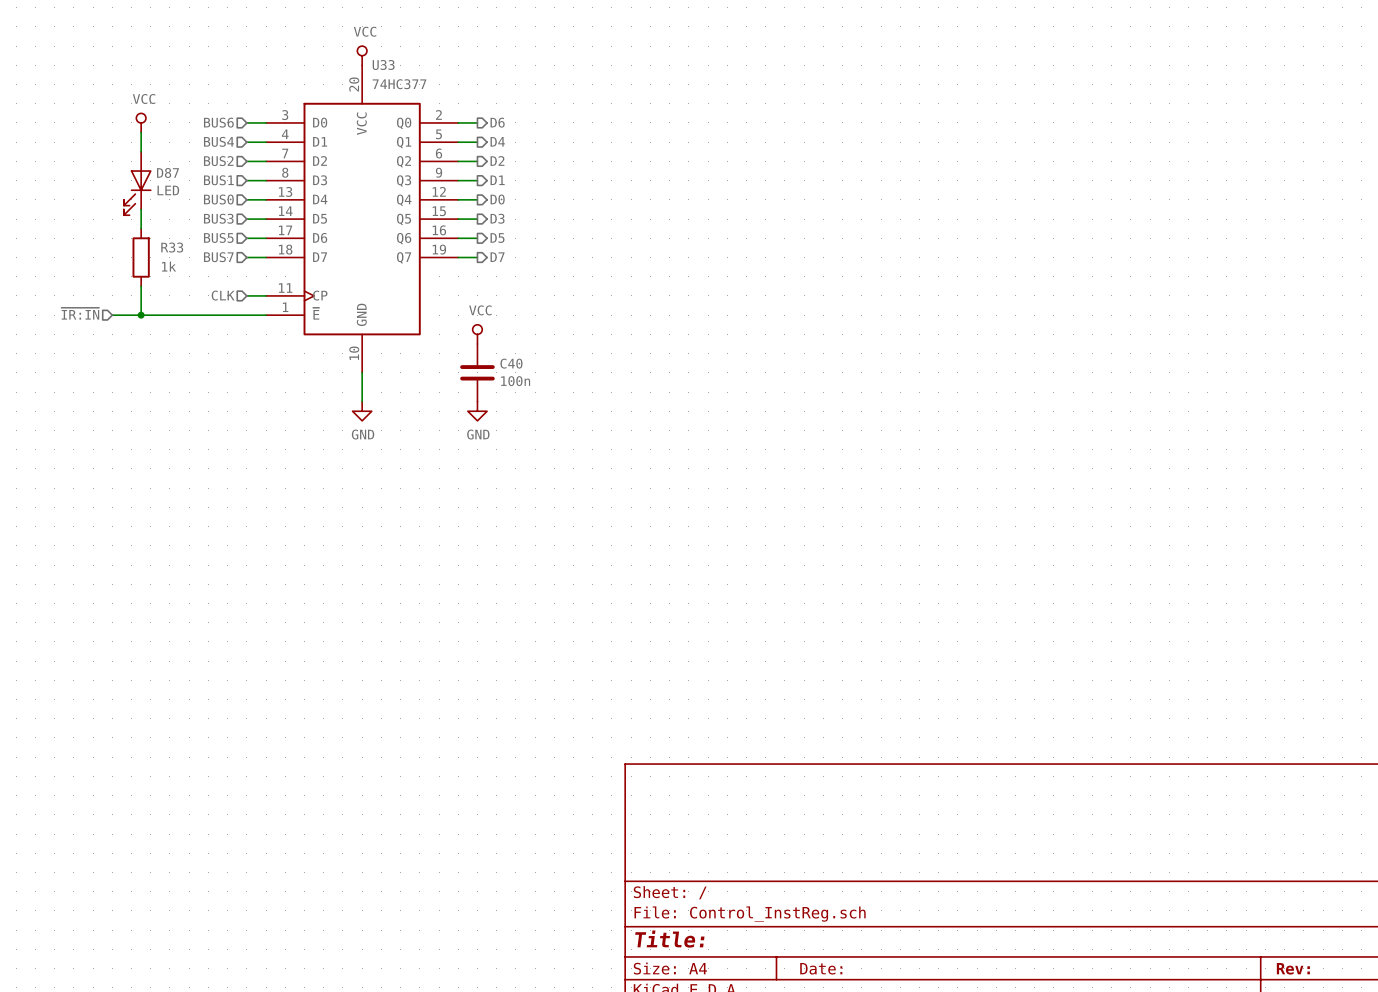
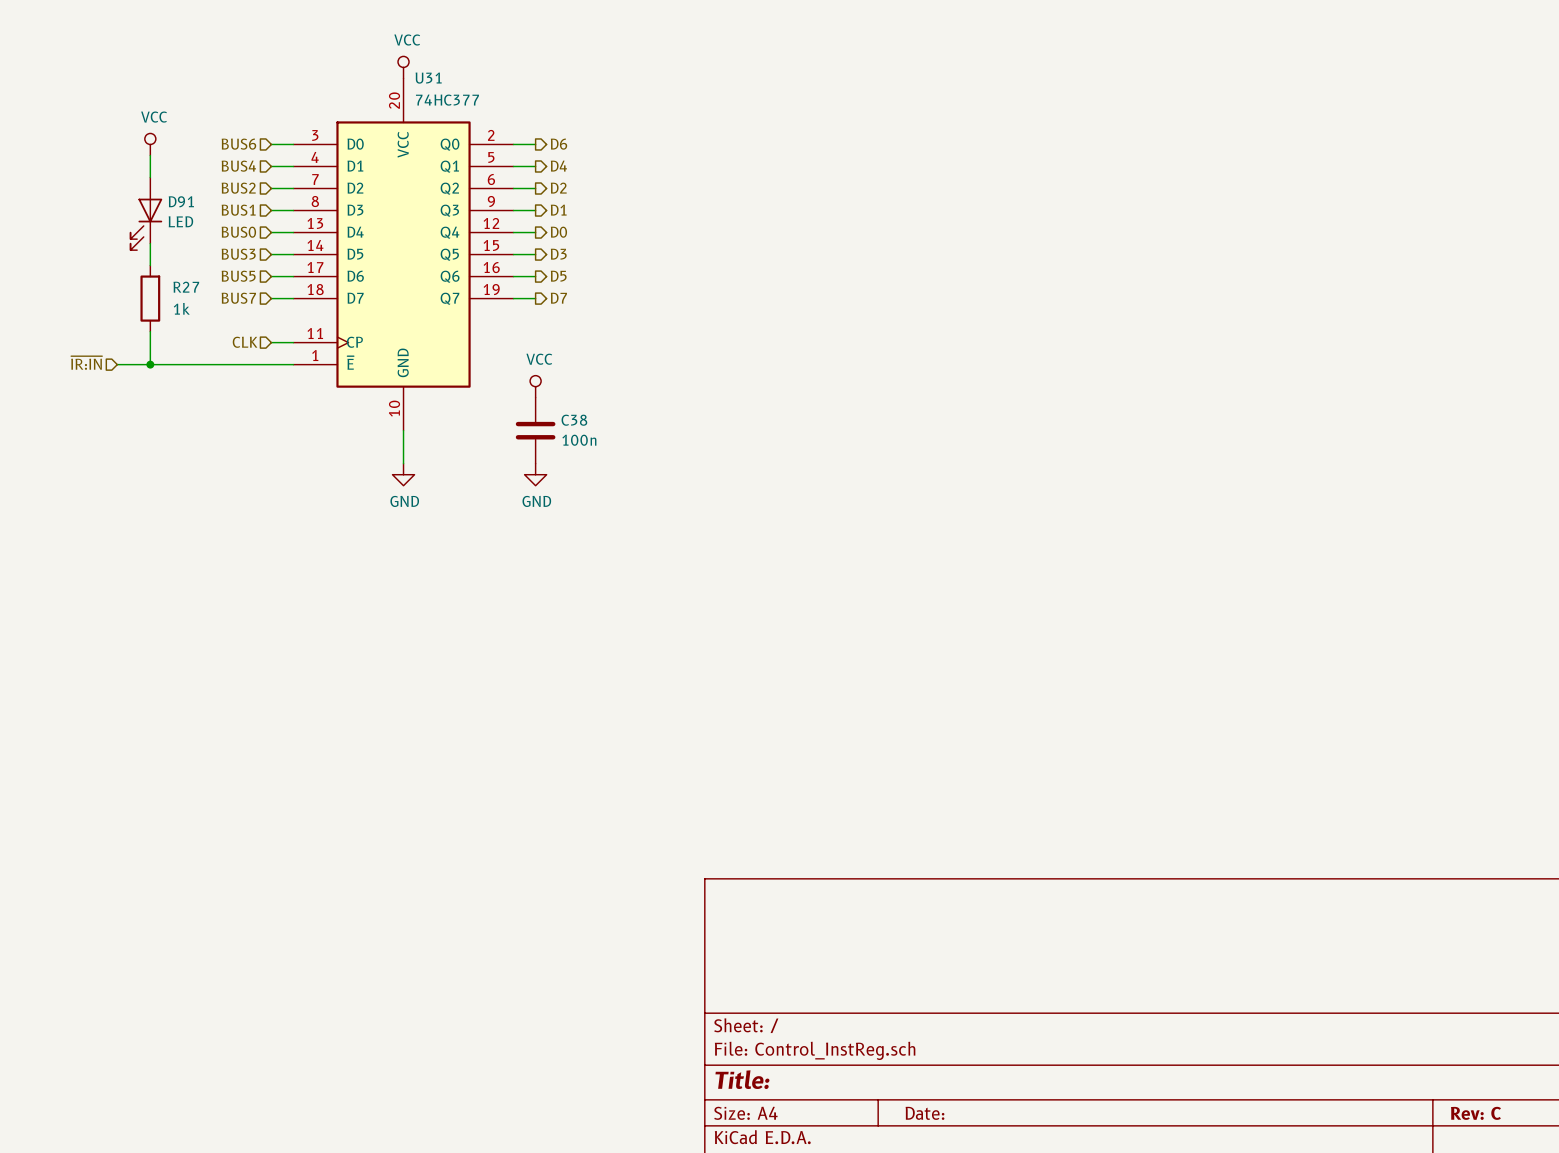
U33 name: U33 (383, 64) -> U31 (428, 78)
D87 name: D87 (167, 172) -> D91 (181, 201)
R33 name: R33 (172, 247) -> R27 (186, 287)
C40 name: C40 (511, 363) -> C38 (574, 420)
title block: Rev: (1293, 968) -> Rev: C (1475, 1113)

